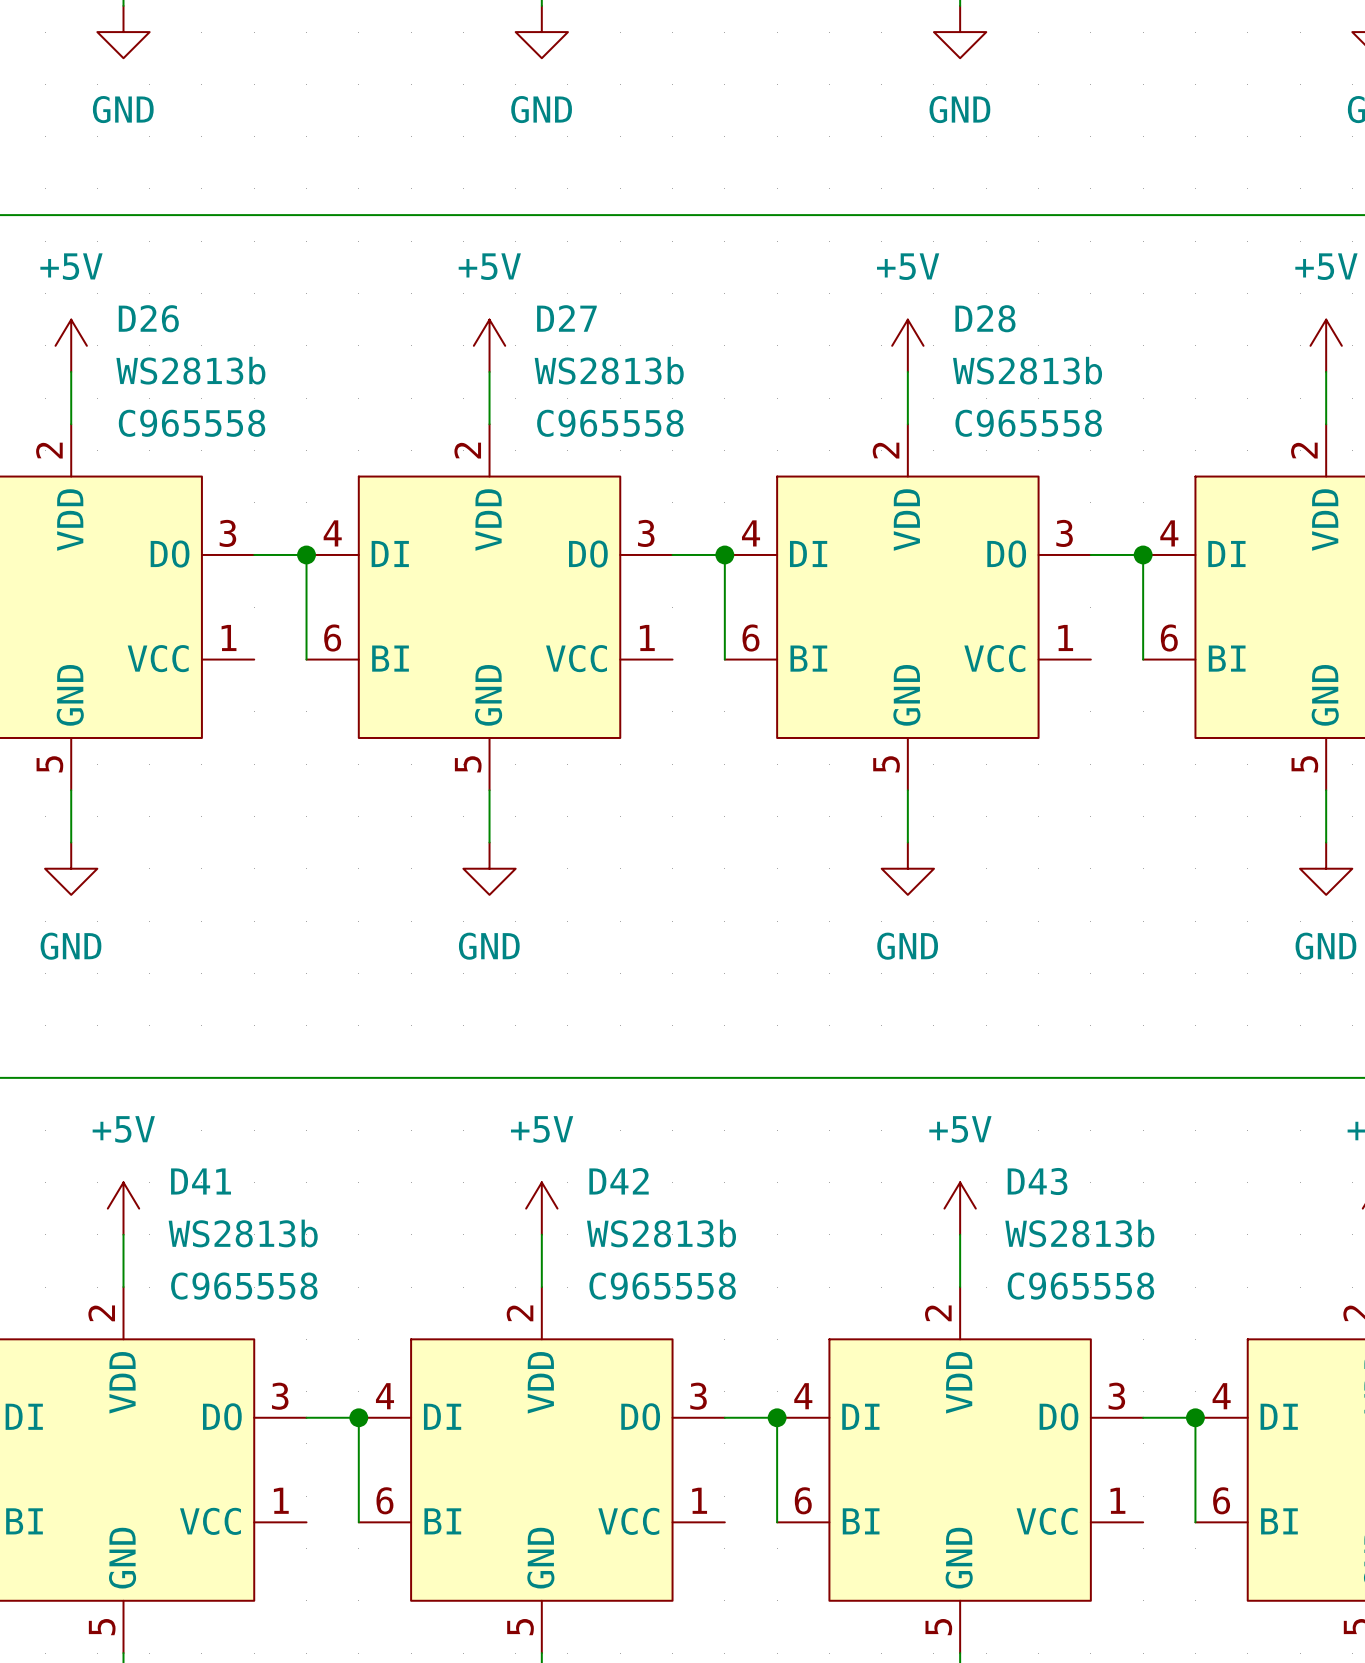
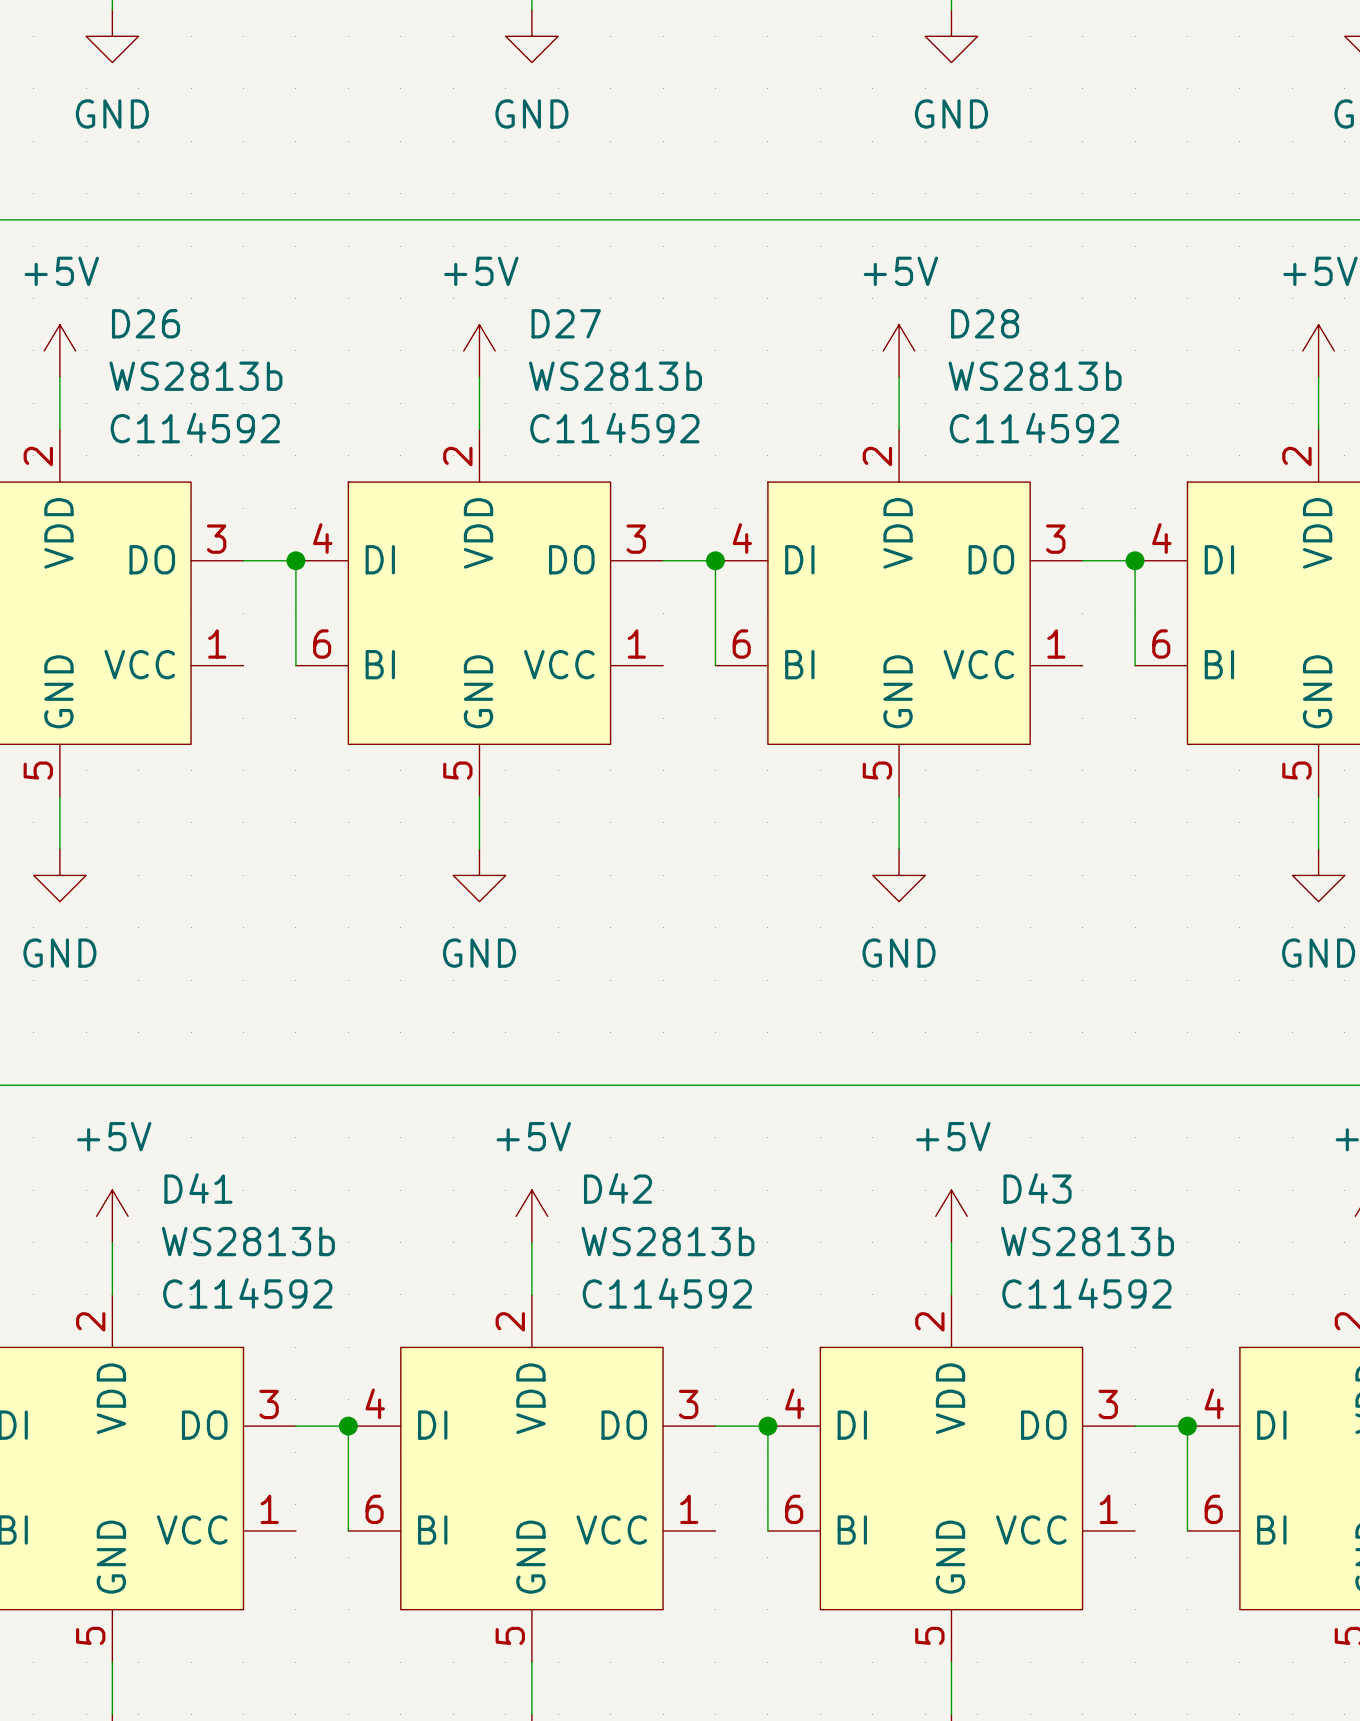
D26 text: C965558 (192, 423) -> C114592 (195, 428)
D27 text: C965558 (610, 423) -> C114592 (614, 428)
D28 text: C965558 (1028, 423) -> C114592 (1034, 428)
D41 text: C965558 (244, 1286) -> C114592 (247, 1293)
D42 text: C965558 (662, 1286) -> C114592 (667, 1293)
D43 text: C965558 (1080, 1286) -> C114592 (1086, 1293)

